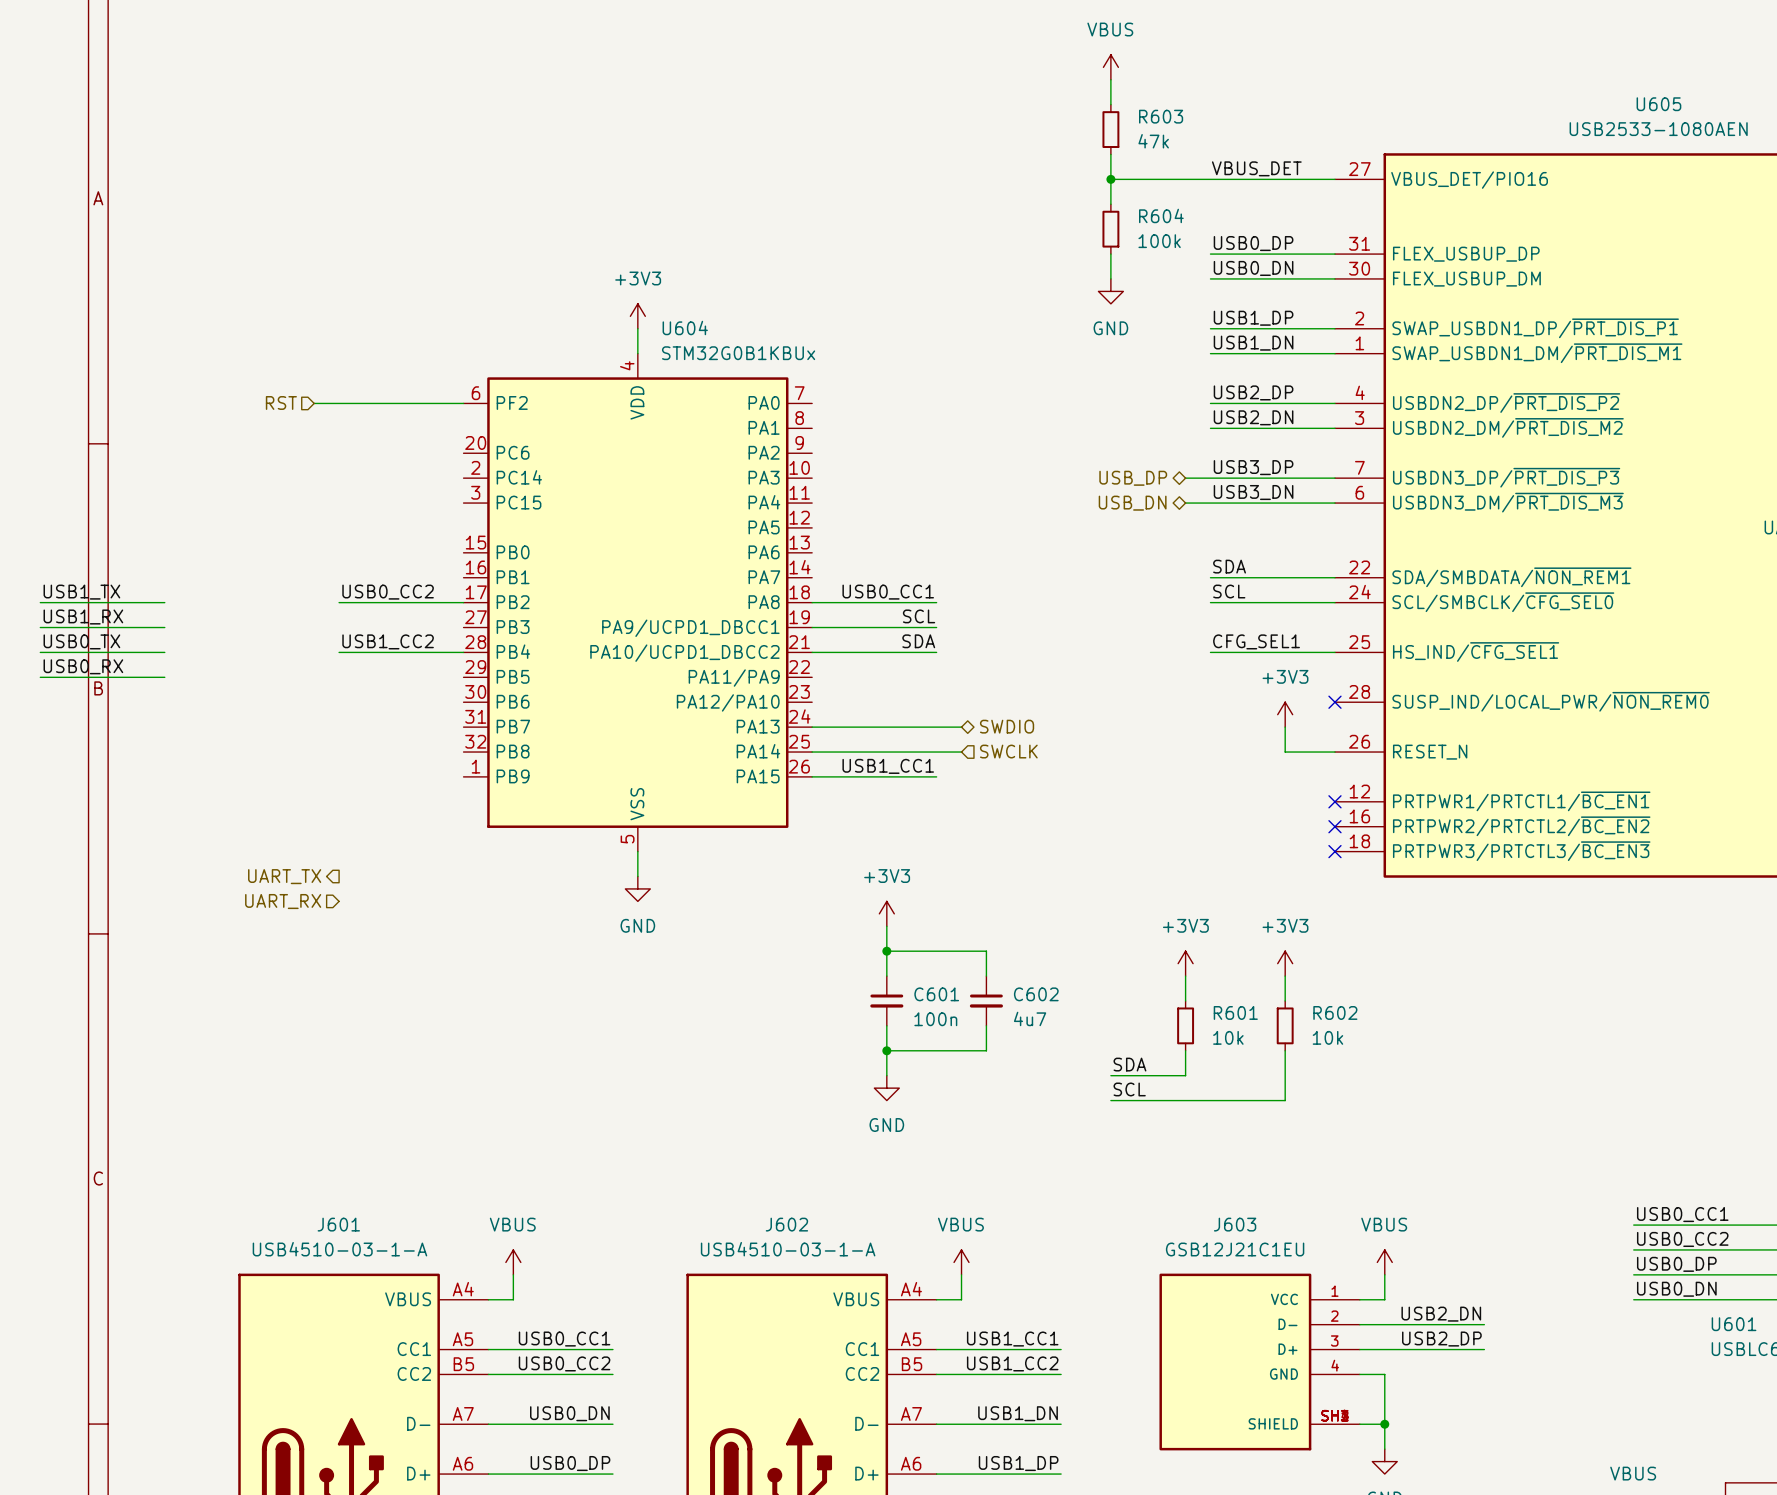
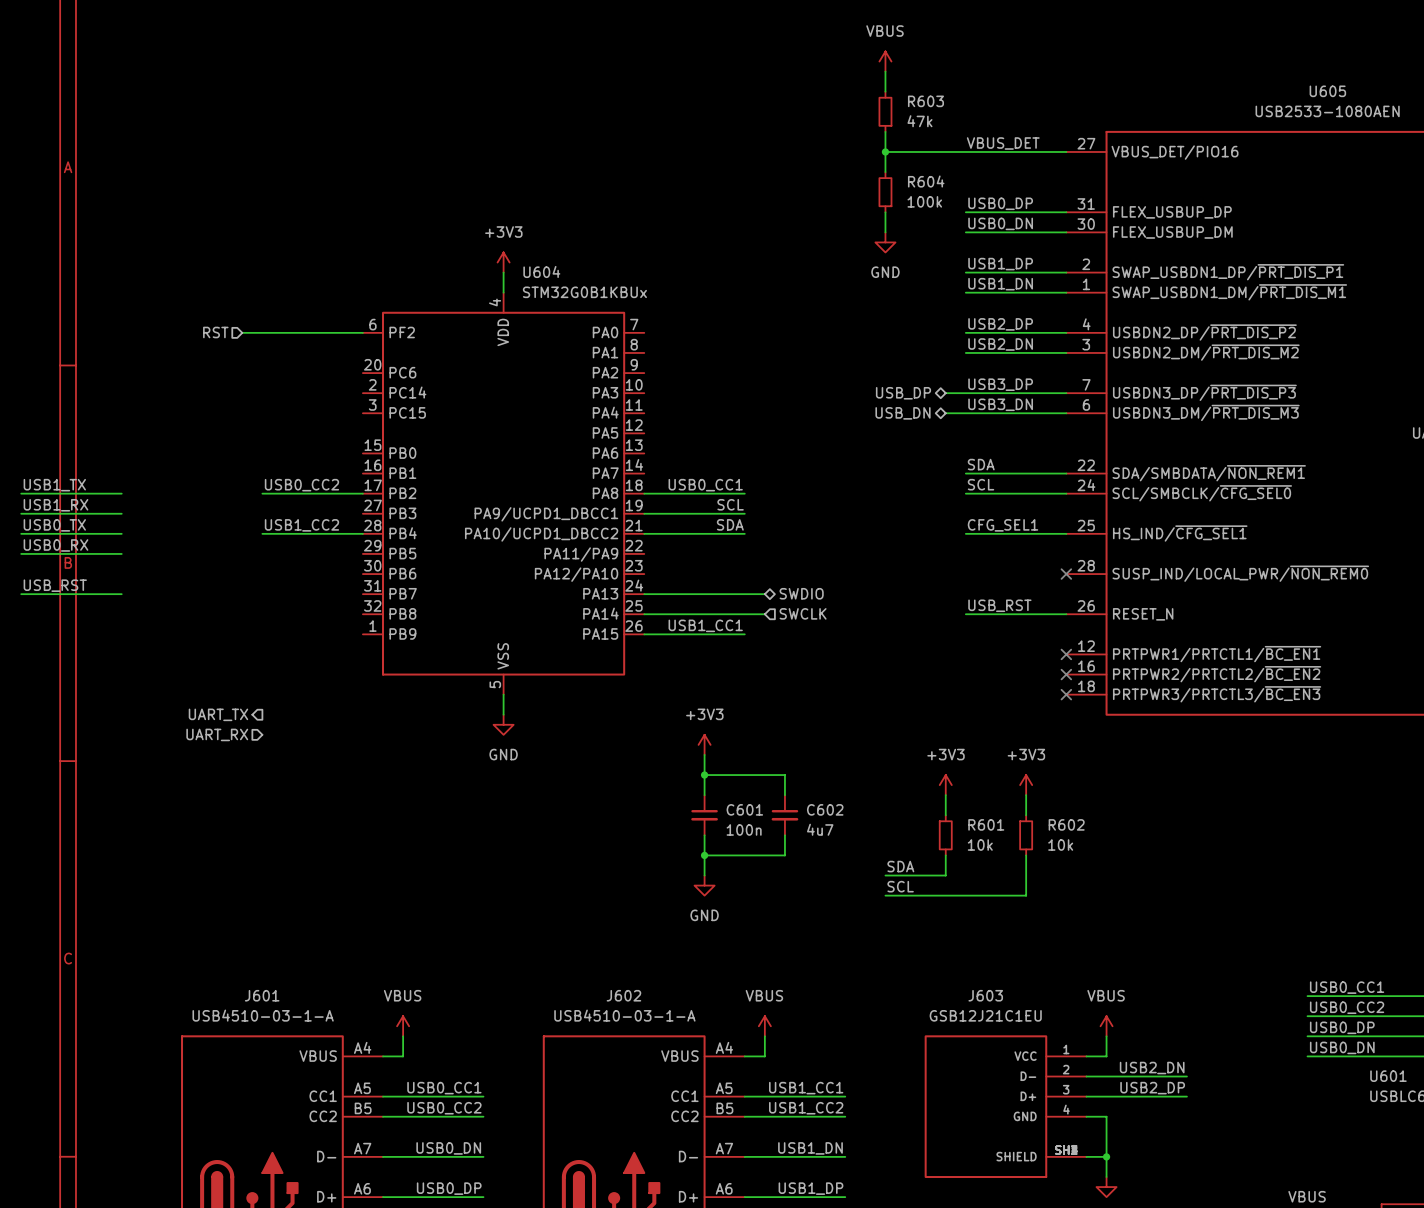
power symbol: +3V3 (1285, 714) -> none
label: none -> USB_RST (55, 585)
wire: none -> (21, 594) (121, 594)
wire: (1285, 727) (1285, 752) -> (965, 614) (1026, 614)
label: none -> USB_RST (999, 605)

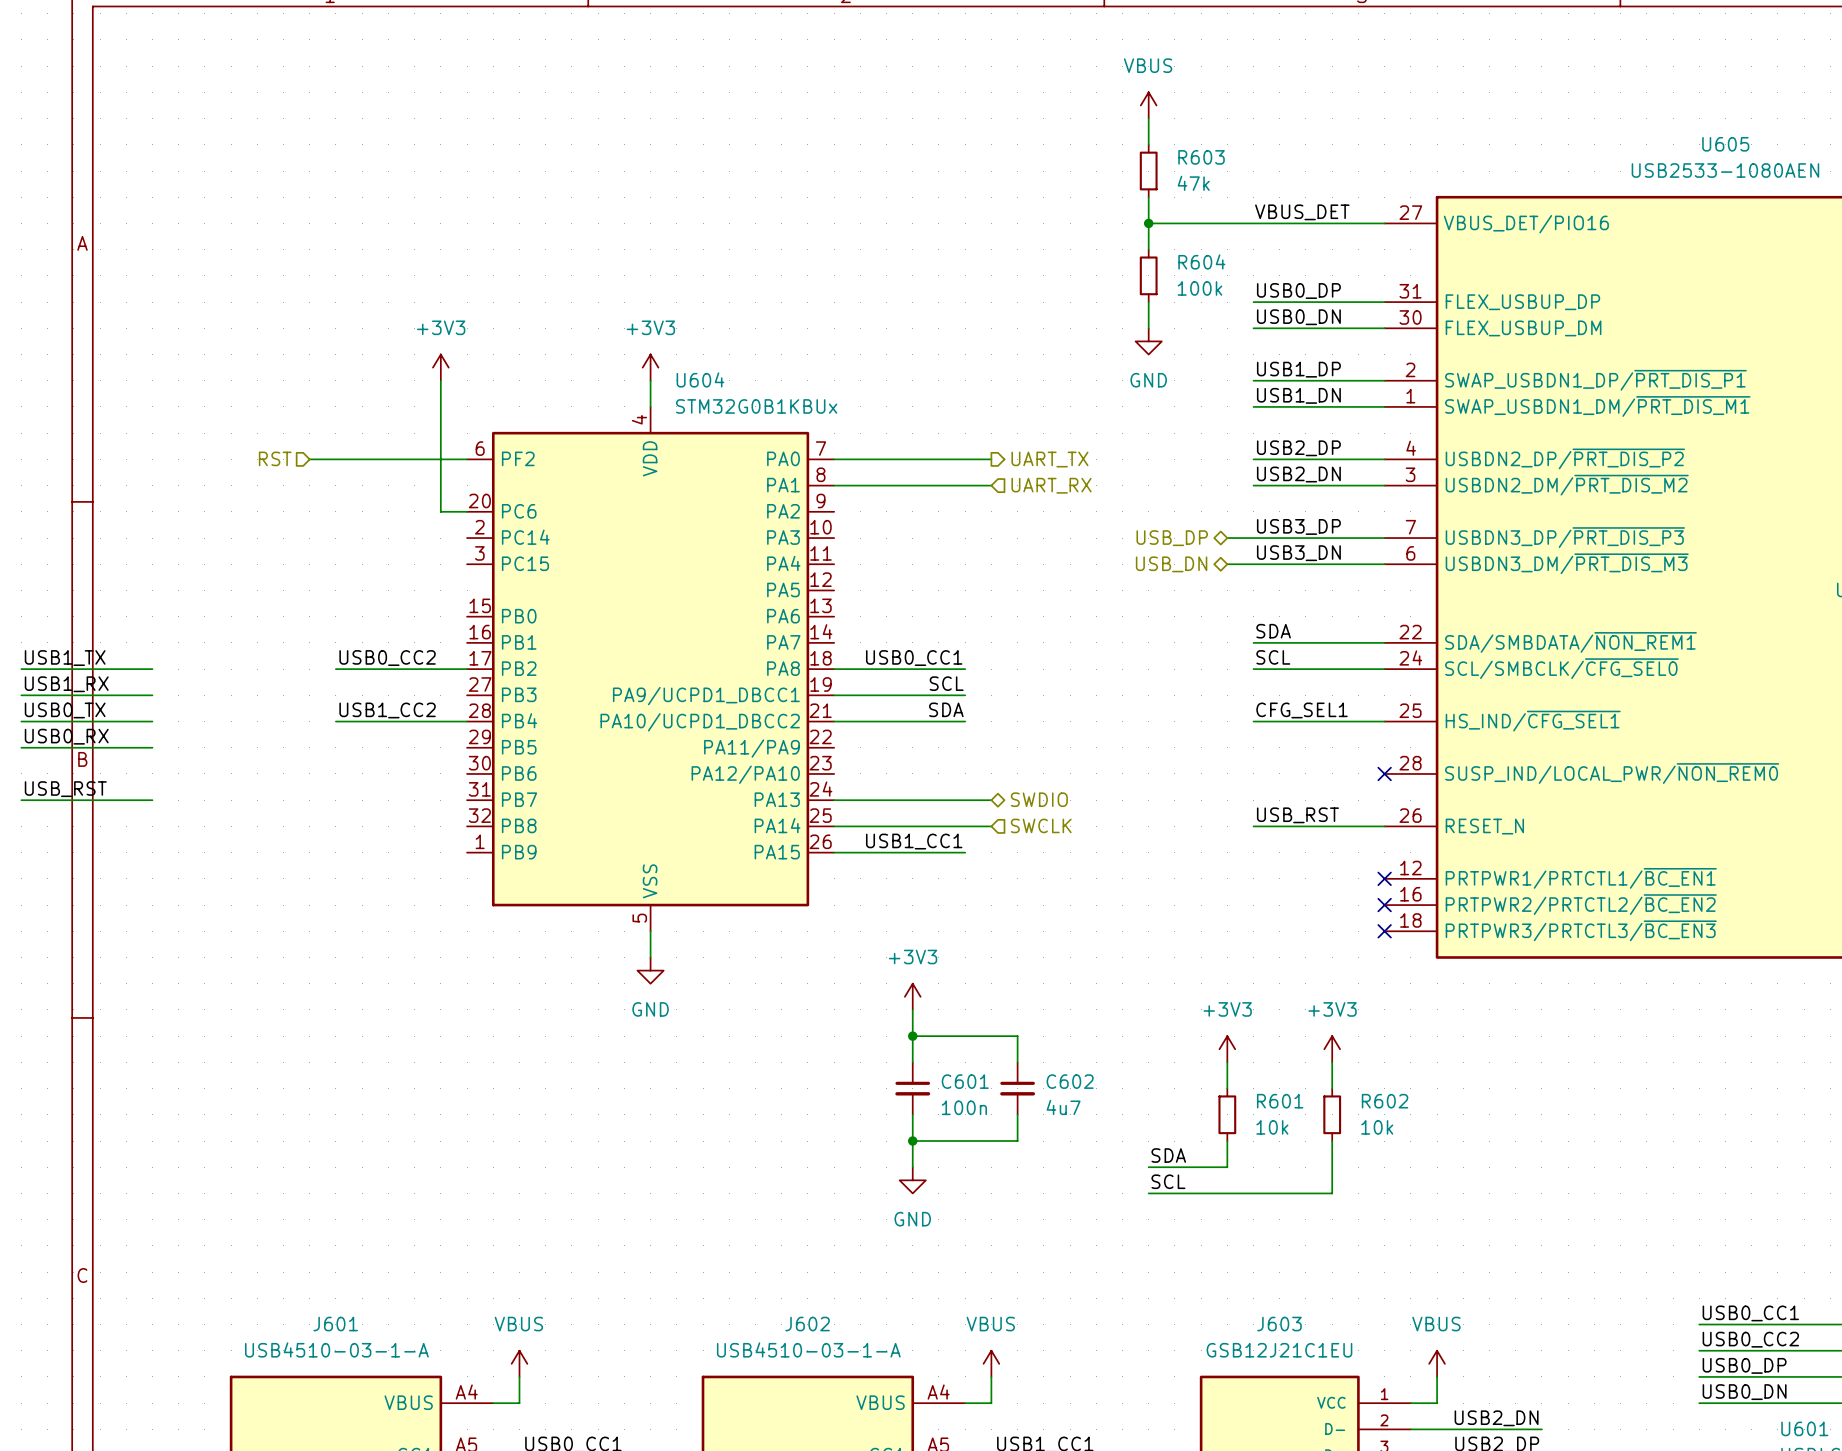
power symbol: none -> +3V3 (440, 367)
wire: none -> (440, 380) (440, 511) (467, 511)
wire: none -> (834, 459) (991, 459)
hierarchical label: none -> UART_TX (1049, 459)
wire: none -> (834, 485) (991, 485)
hierarchical label: none -> UART_RX (1051, 485)
hierarchical label: UART_TX (218, 714) -> none
hierarchical label: UART_RX (217, 734) -> none

